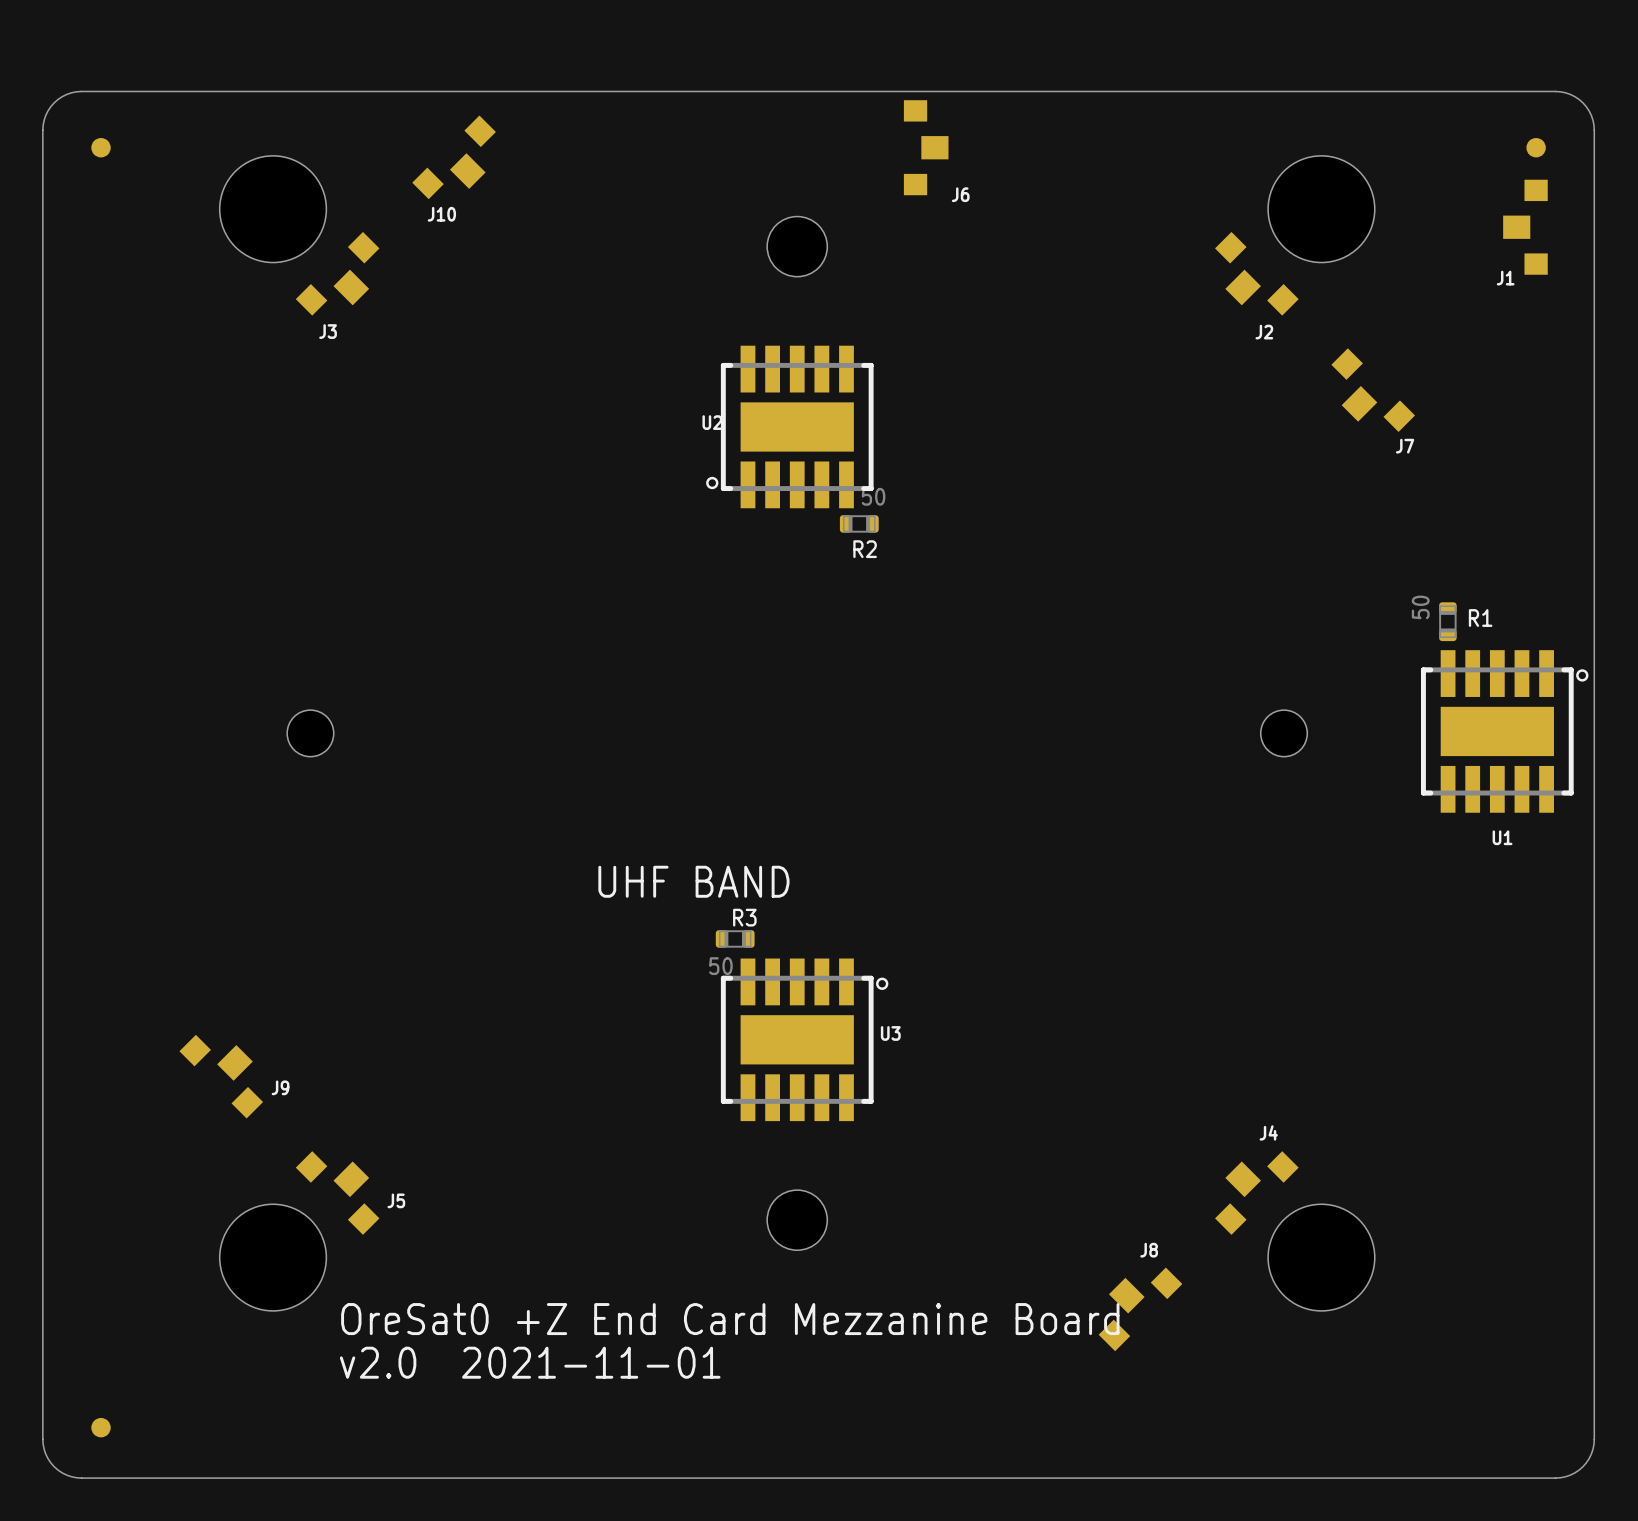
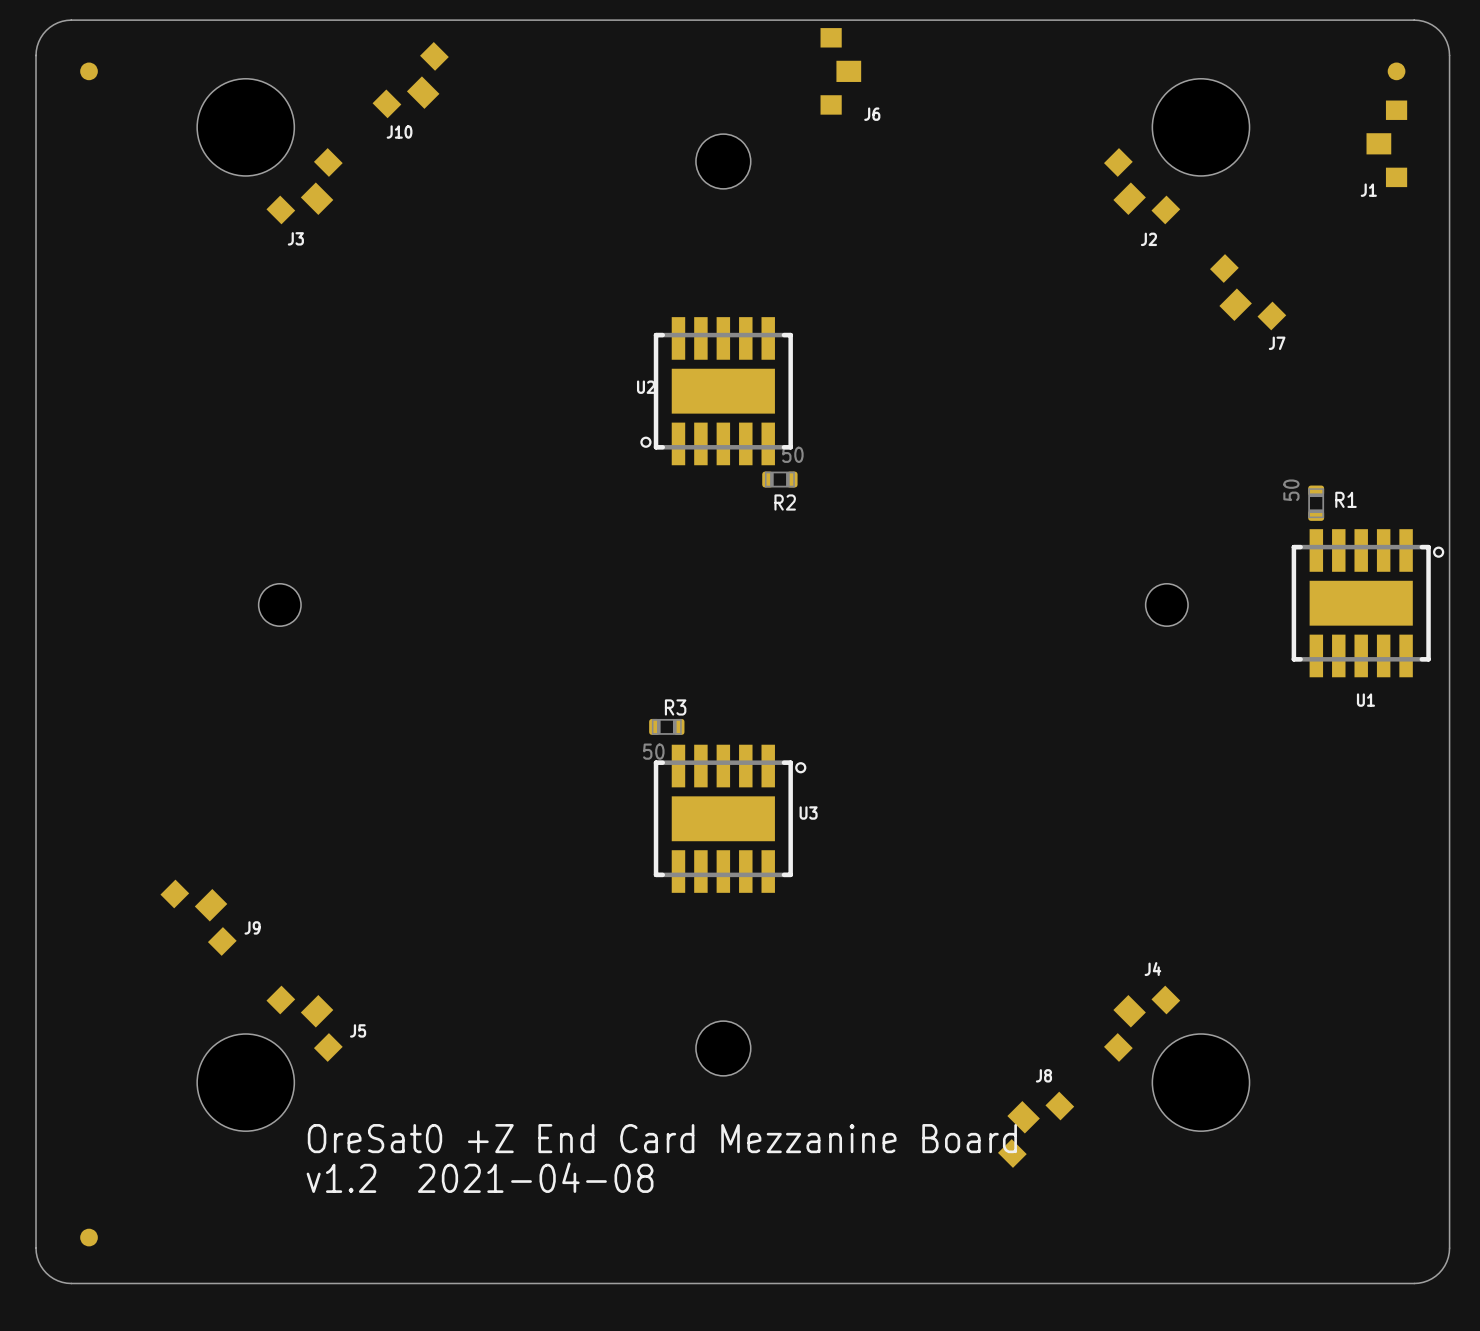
U2 position: (789, 426) -> (716, 391)
R2 position: (859, 523) -> (779, 479)
text: UHF BAND (693, 881) -> none
R3 position: (735, 938) -> (666, 726)
U3 position: (804, 1039) -> (730, 818)
text: v2.0 2021-11-01 (530, 1362) -> v1.2 2021-04-08 (480, 1177)

